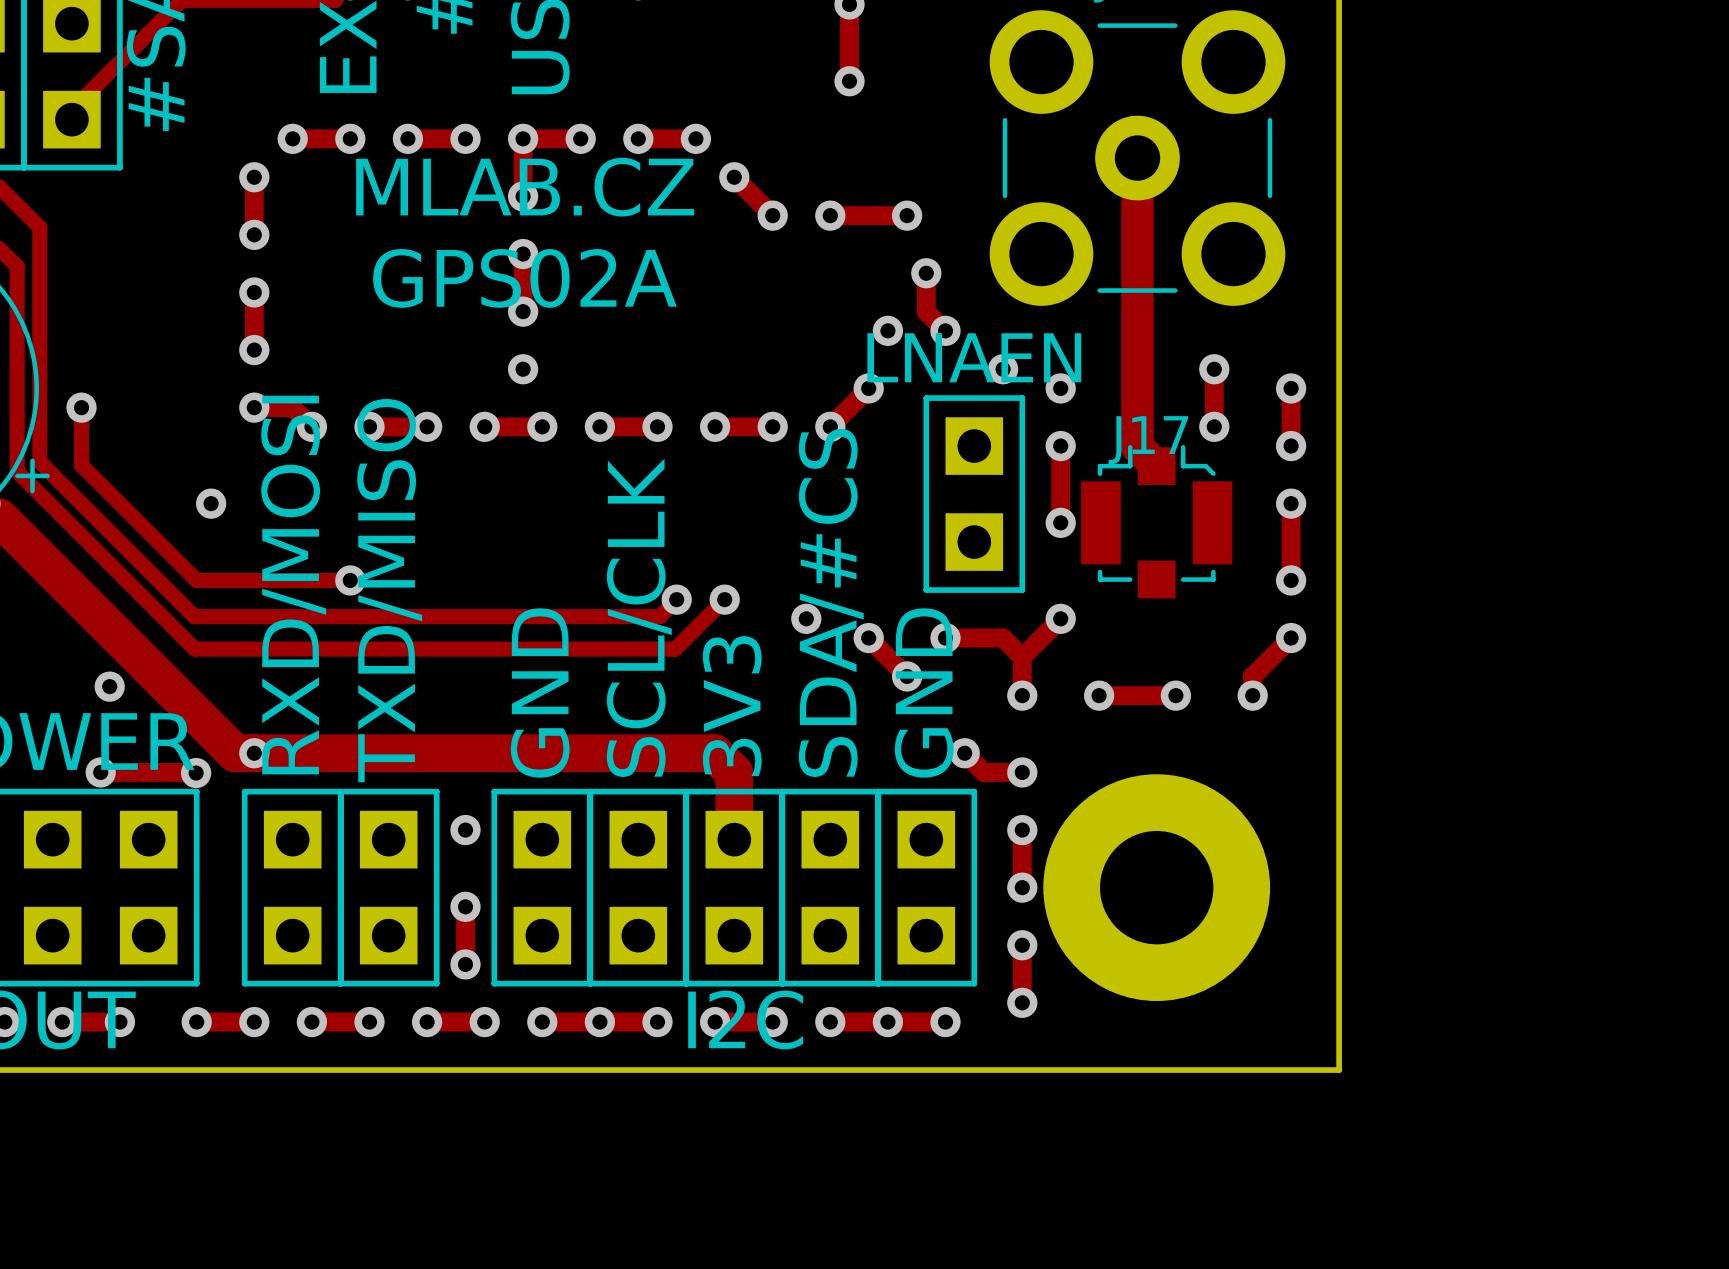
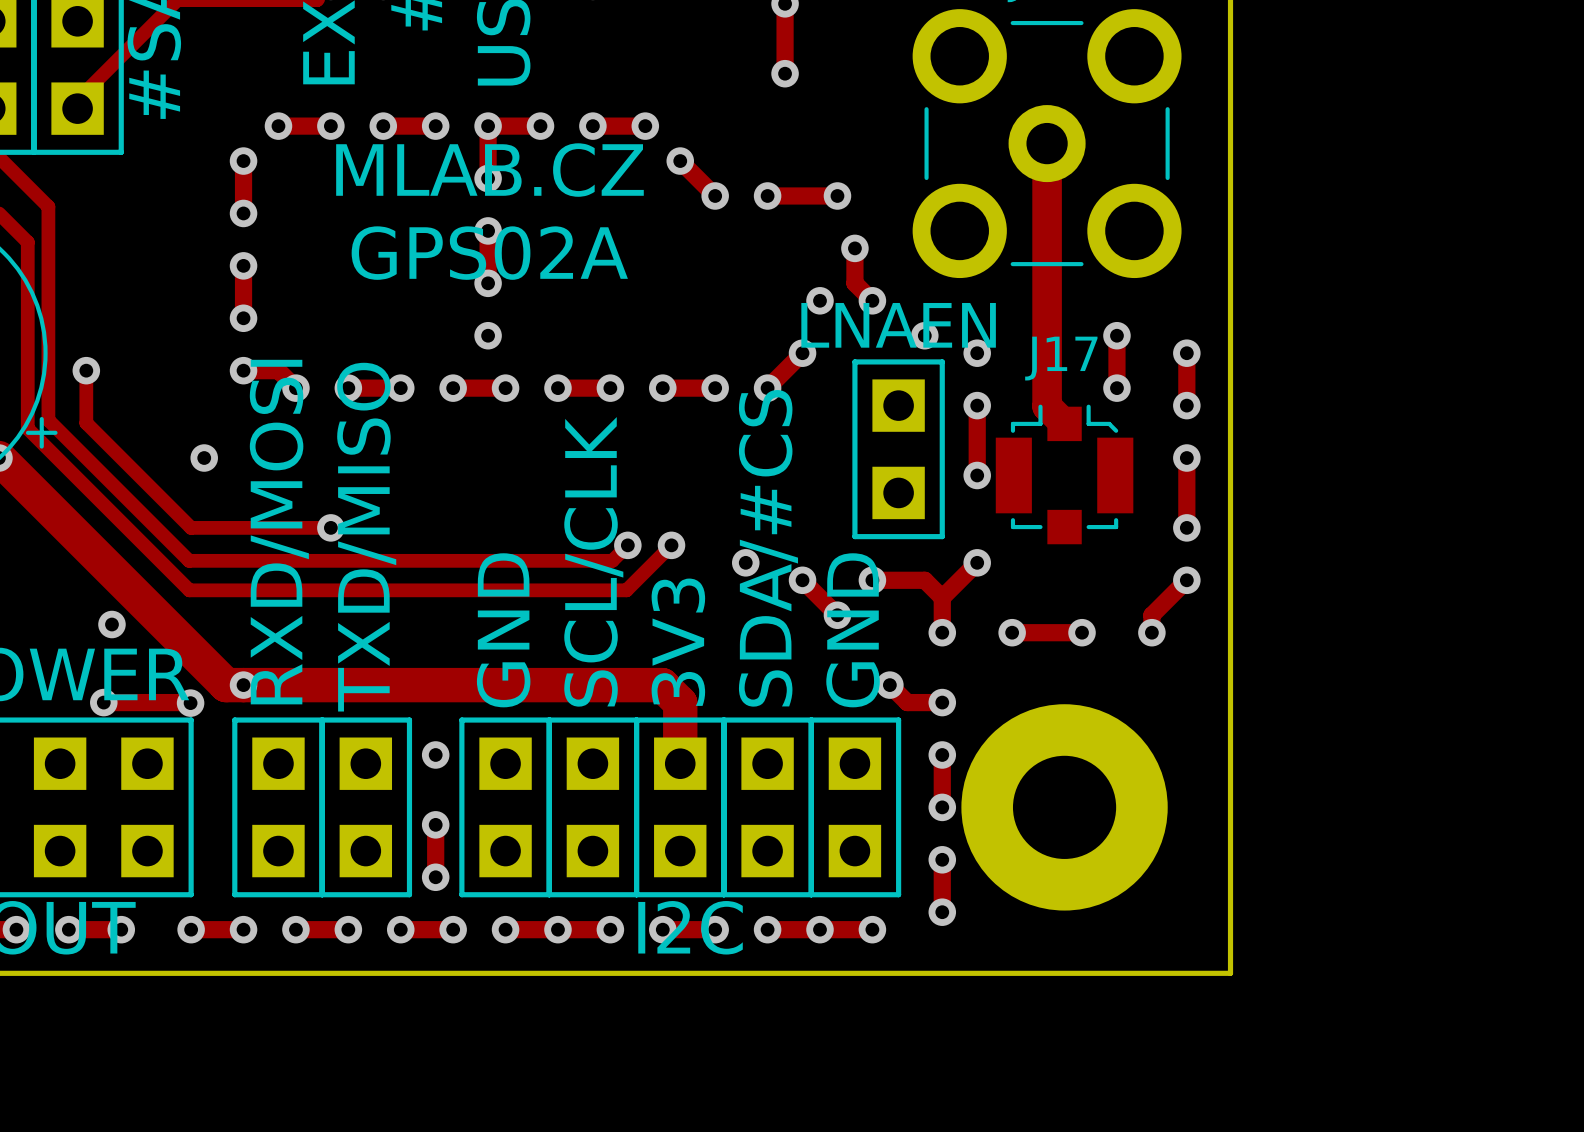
J17 name position: J17 (1148, 440) -> J17 (1061, 358)

